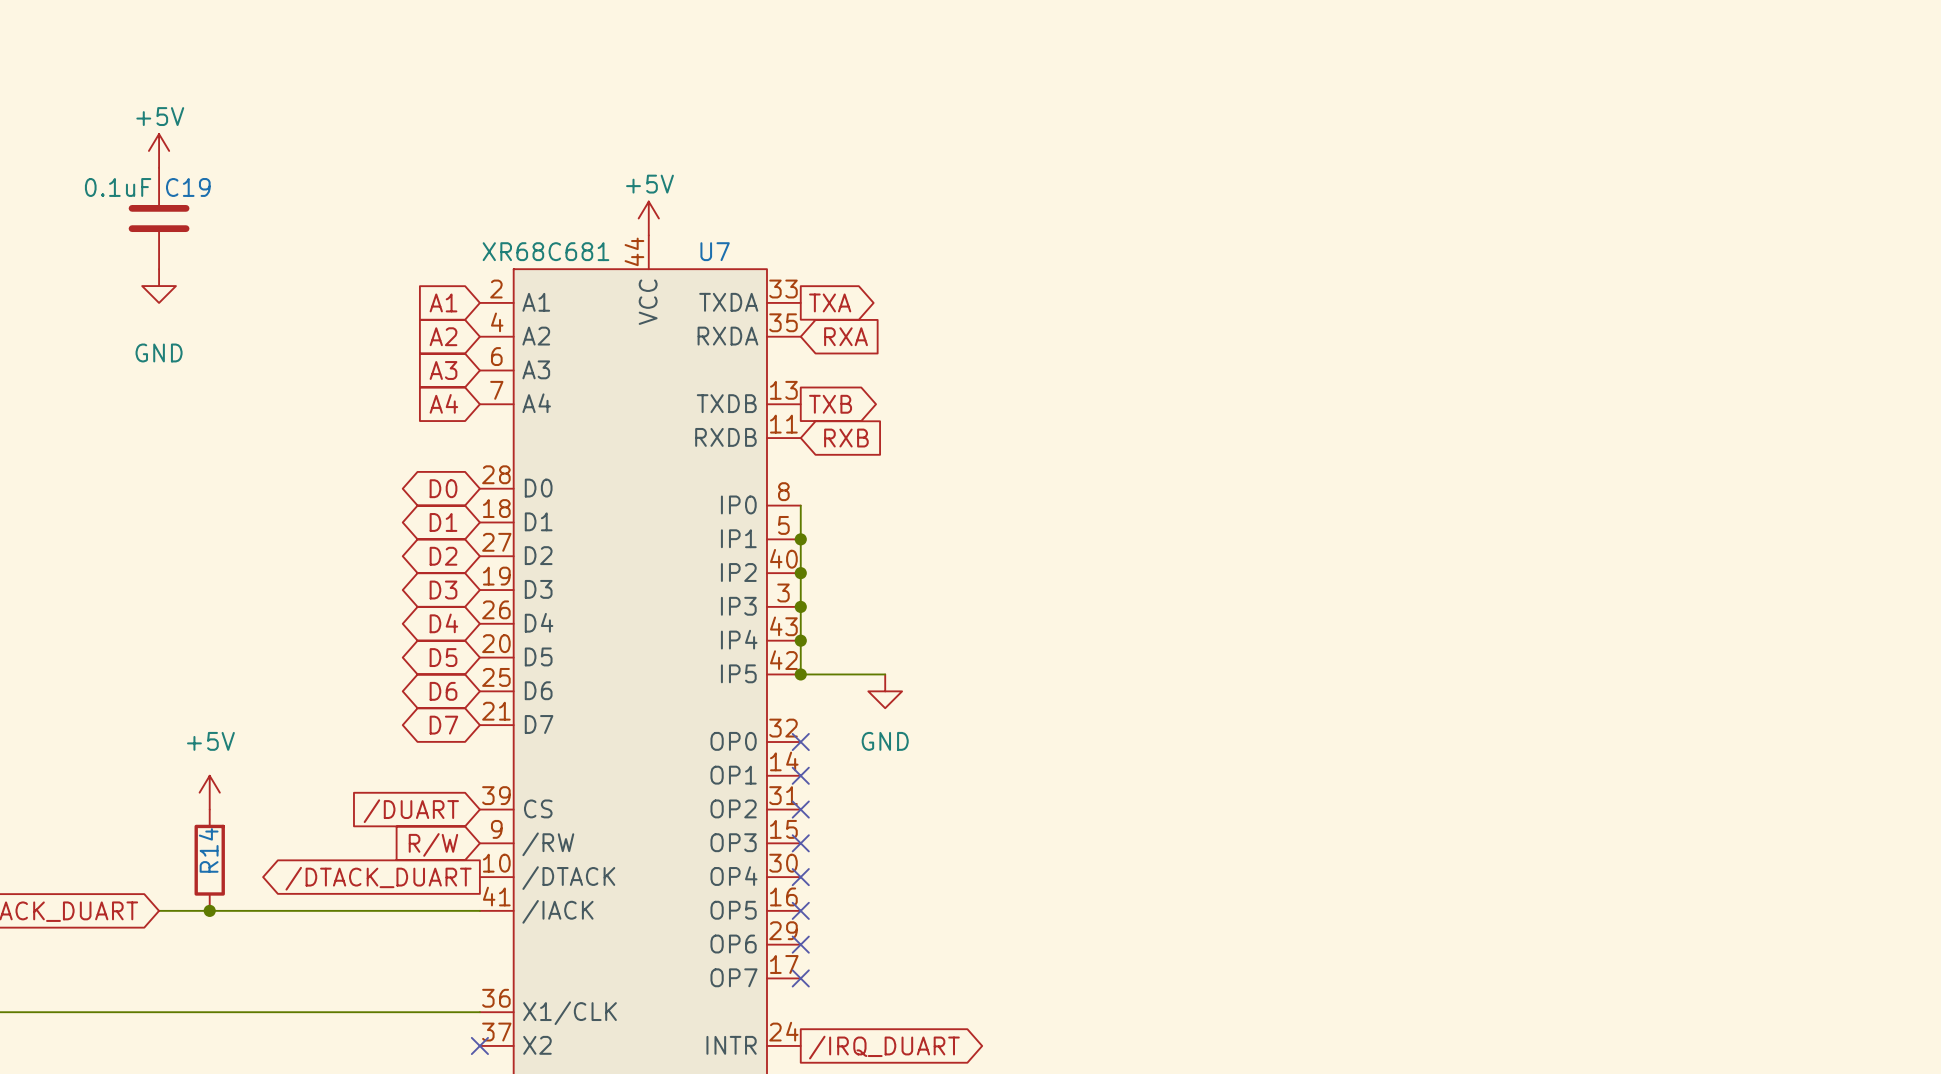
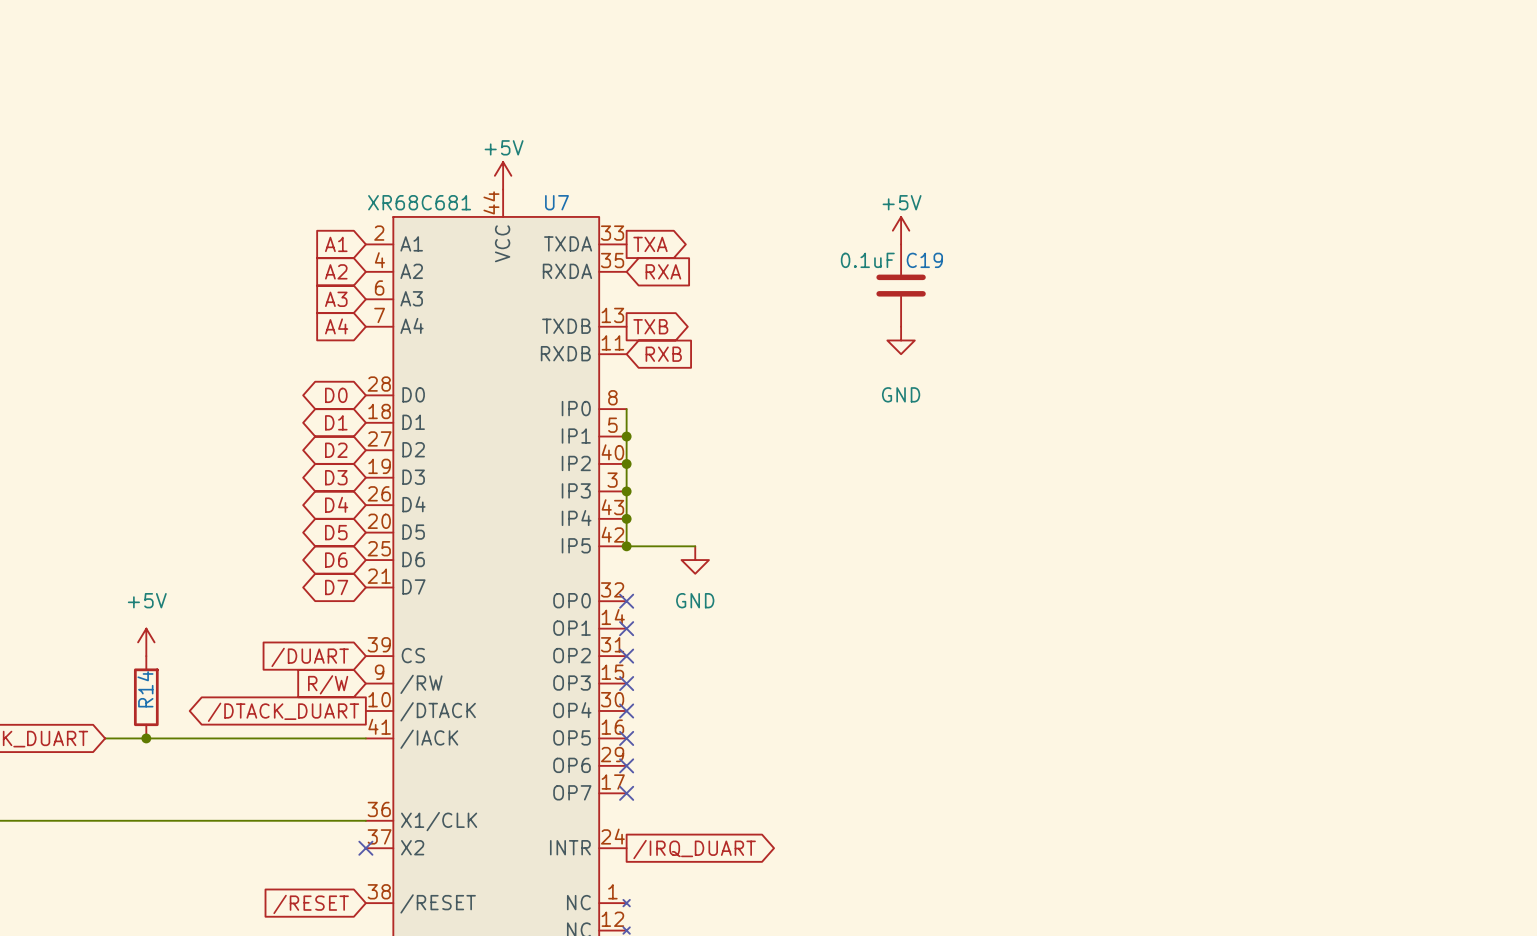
power symbol: +5V (159, 150) -> none
C19 position: (159, 218) -> (901, 285)
power symbol: GND (159, 286) -> none
power symbol: none -> +5V (901, 230)
power symbol: none -> GND (901, 340)

